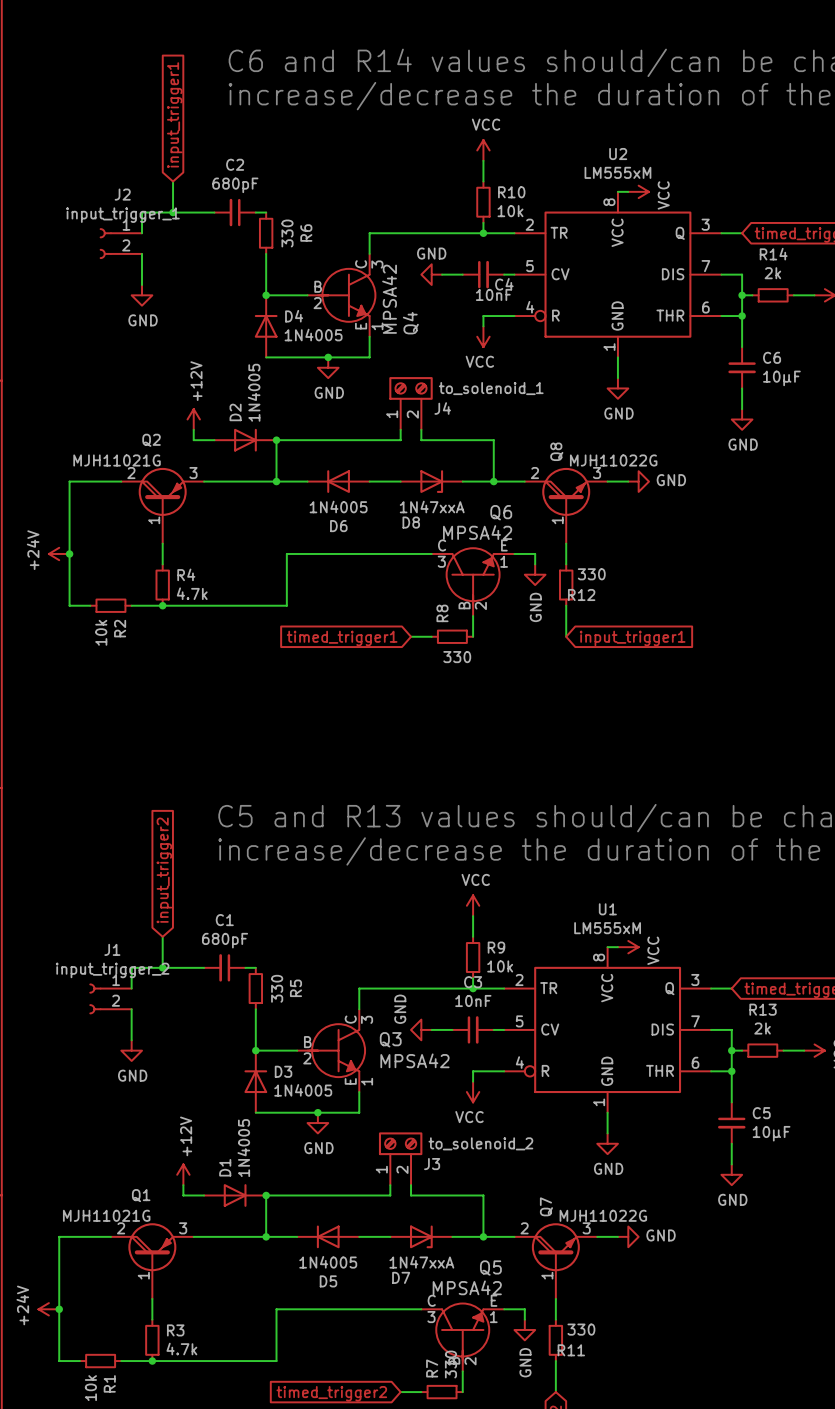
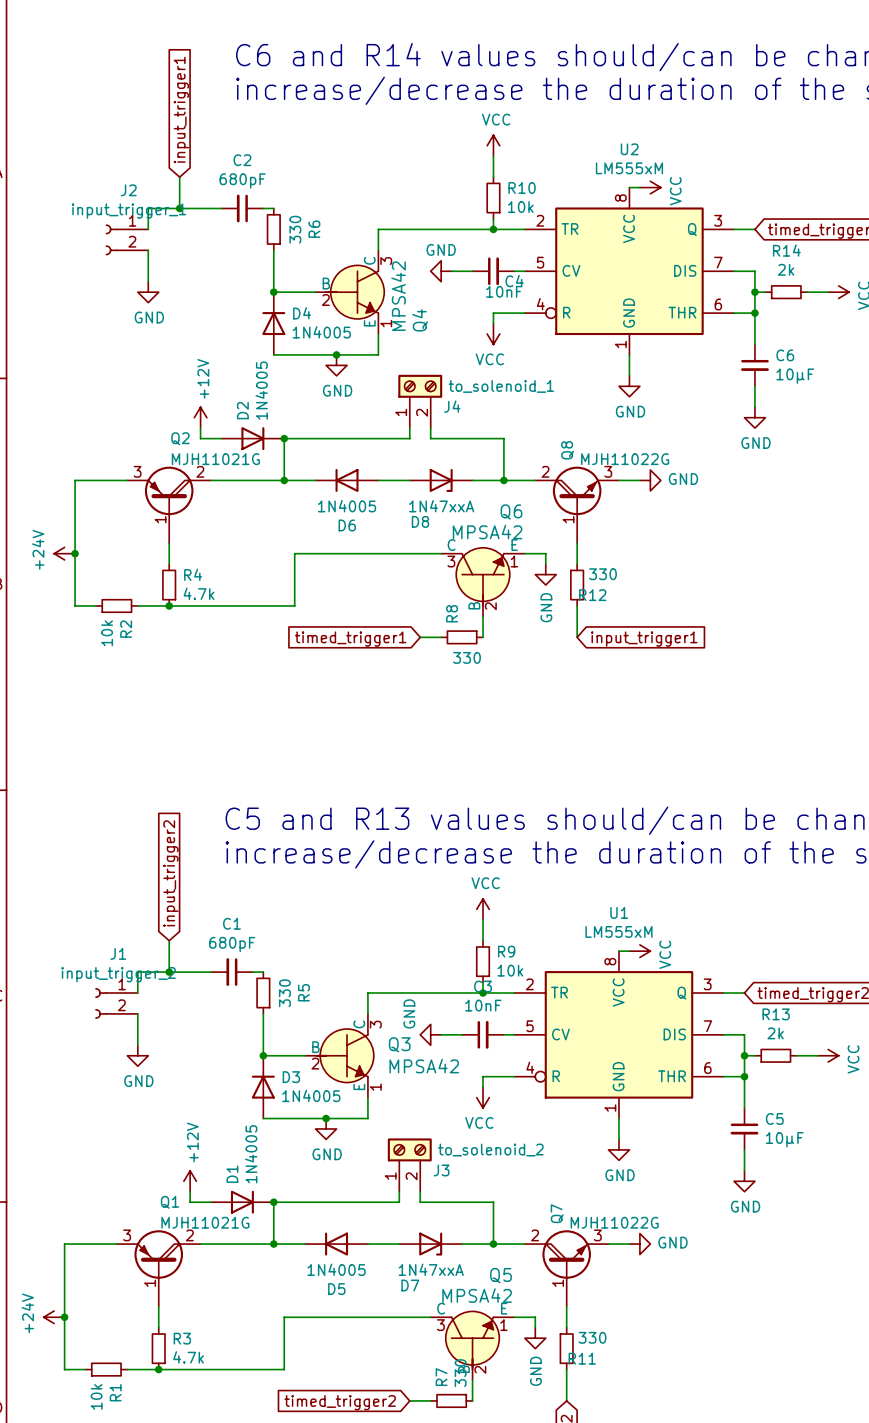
Q2 flip: as is (162, 491) -> left-right (169, 490)
Q1 flip: as is (152, 1247) -> left-right (158, 1254)

